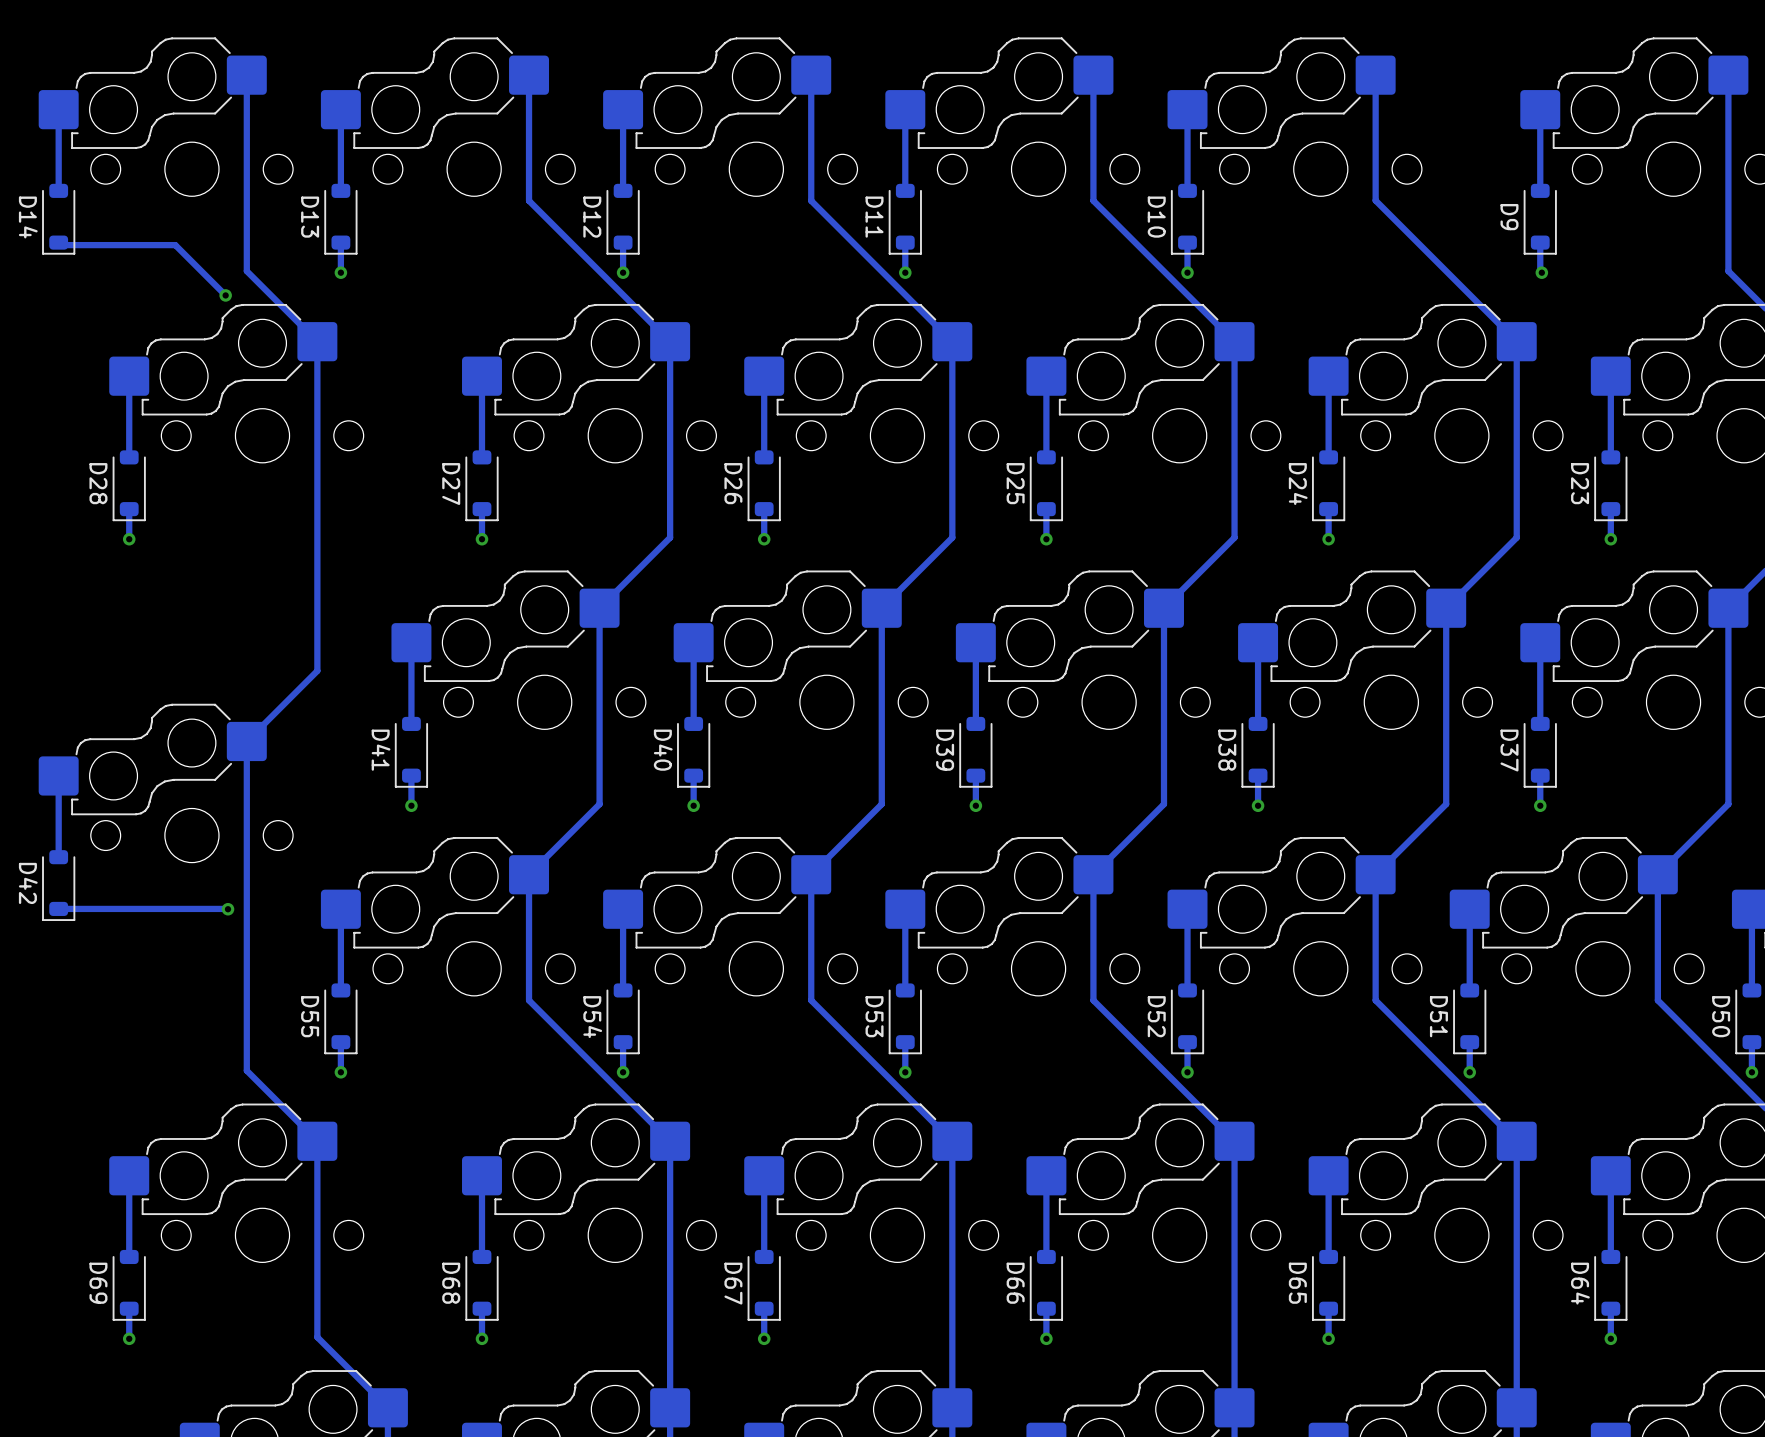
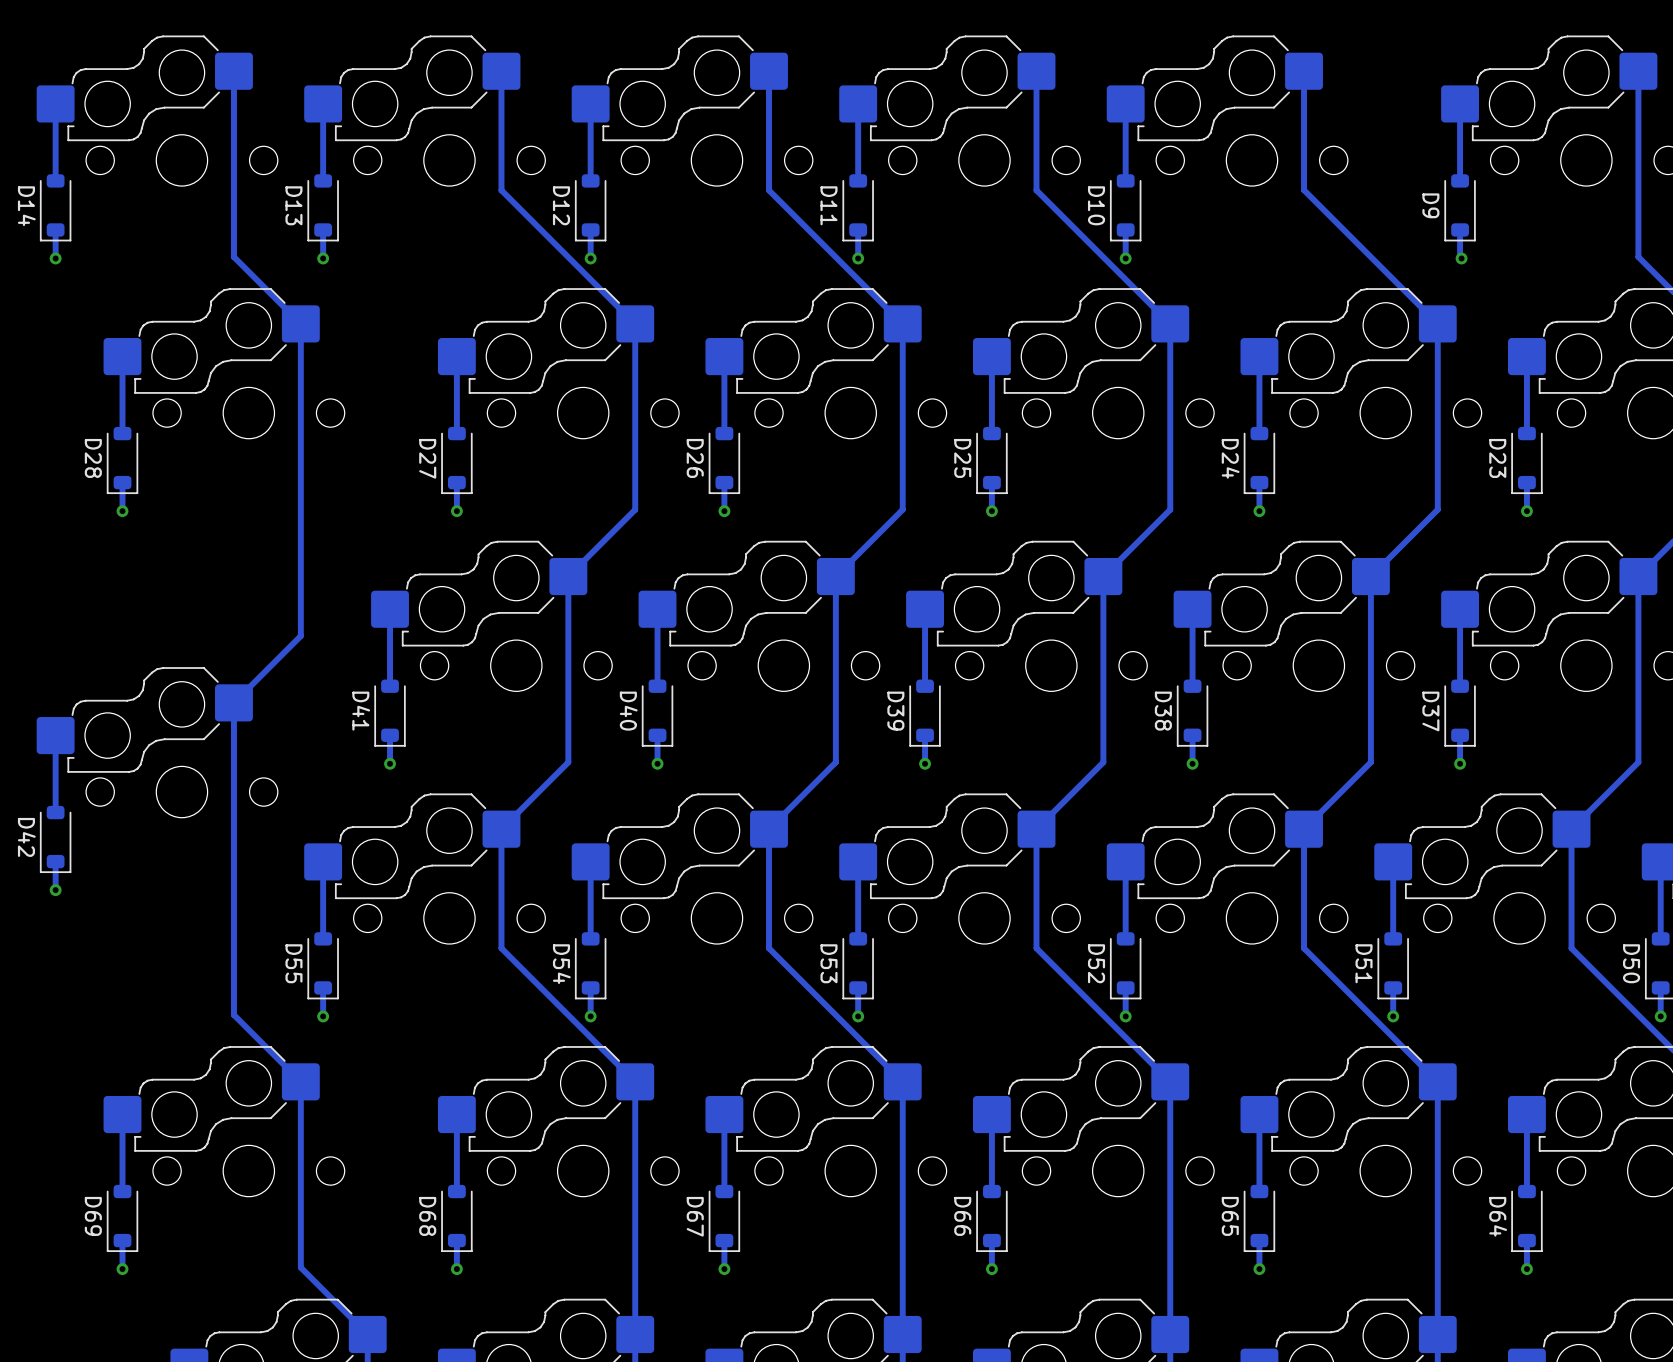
track: none -> (55, 229) (55, 258)
track: (61, 245) (175, 245) (225, 295) -> none
via: none -> (55, 258)
via: (225, 295) -> none
track: (58, 908) (228, 909) -> (55, 861) (55, 890)
via: (228, 909) -> none
via: none -> (55, 890)

